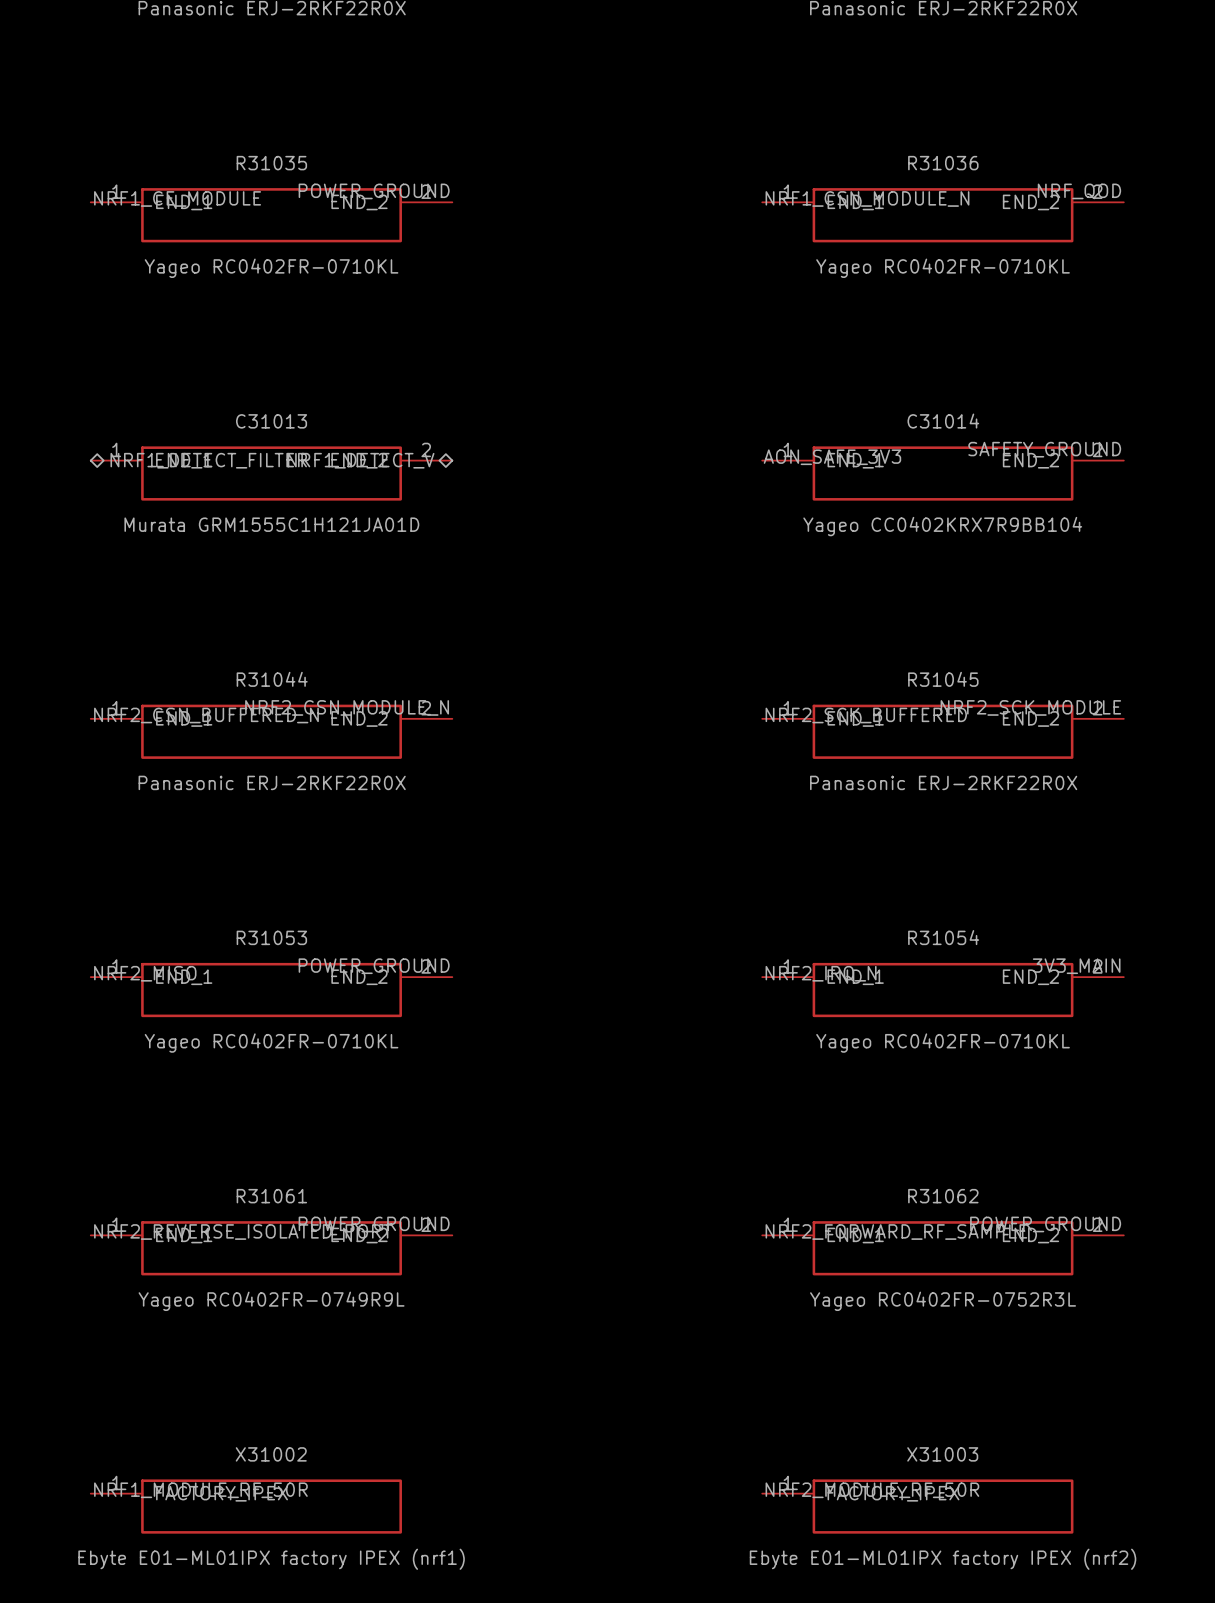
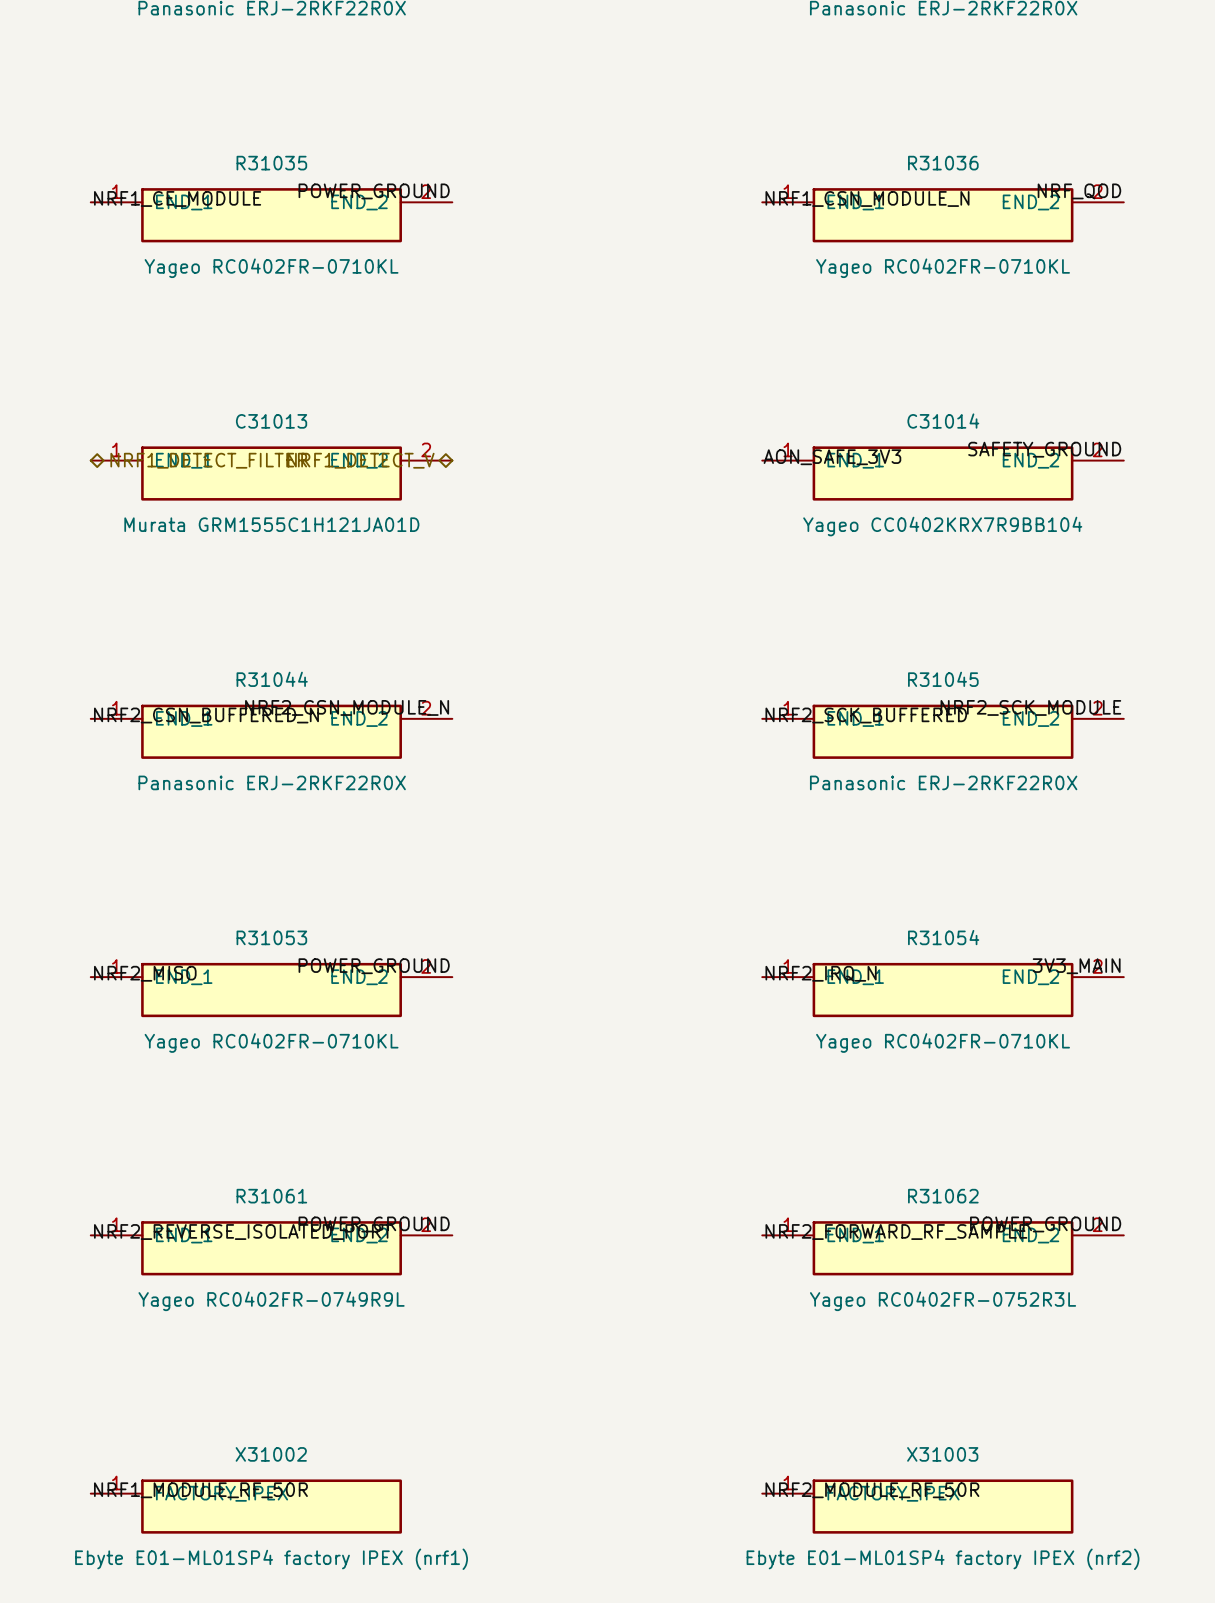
X31002 value: Ebyte E01-ML01IPX factory IPEX (nrf1) (271, 1559) -> Ebyte E01-ML01SP4 factory IPEX (nrf1) (271, 1559)
X31003 value: Ebyte E01-ML01IPX factory IPEX (nrf2) (943, 1559) -> Ebyte E01-ML01SP4 factory IPEX (nrf2) (943, 1559)

